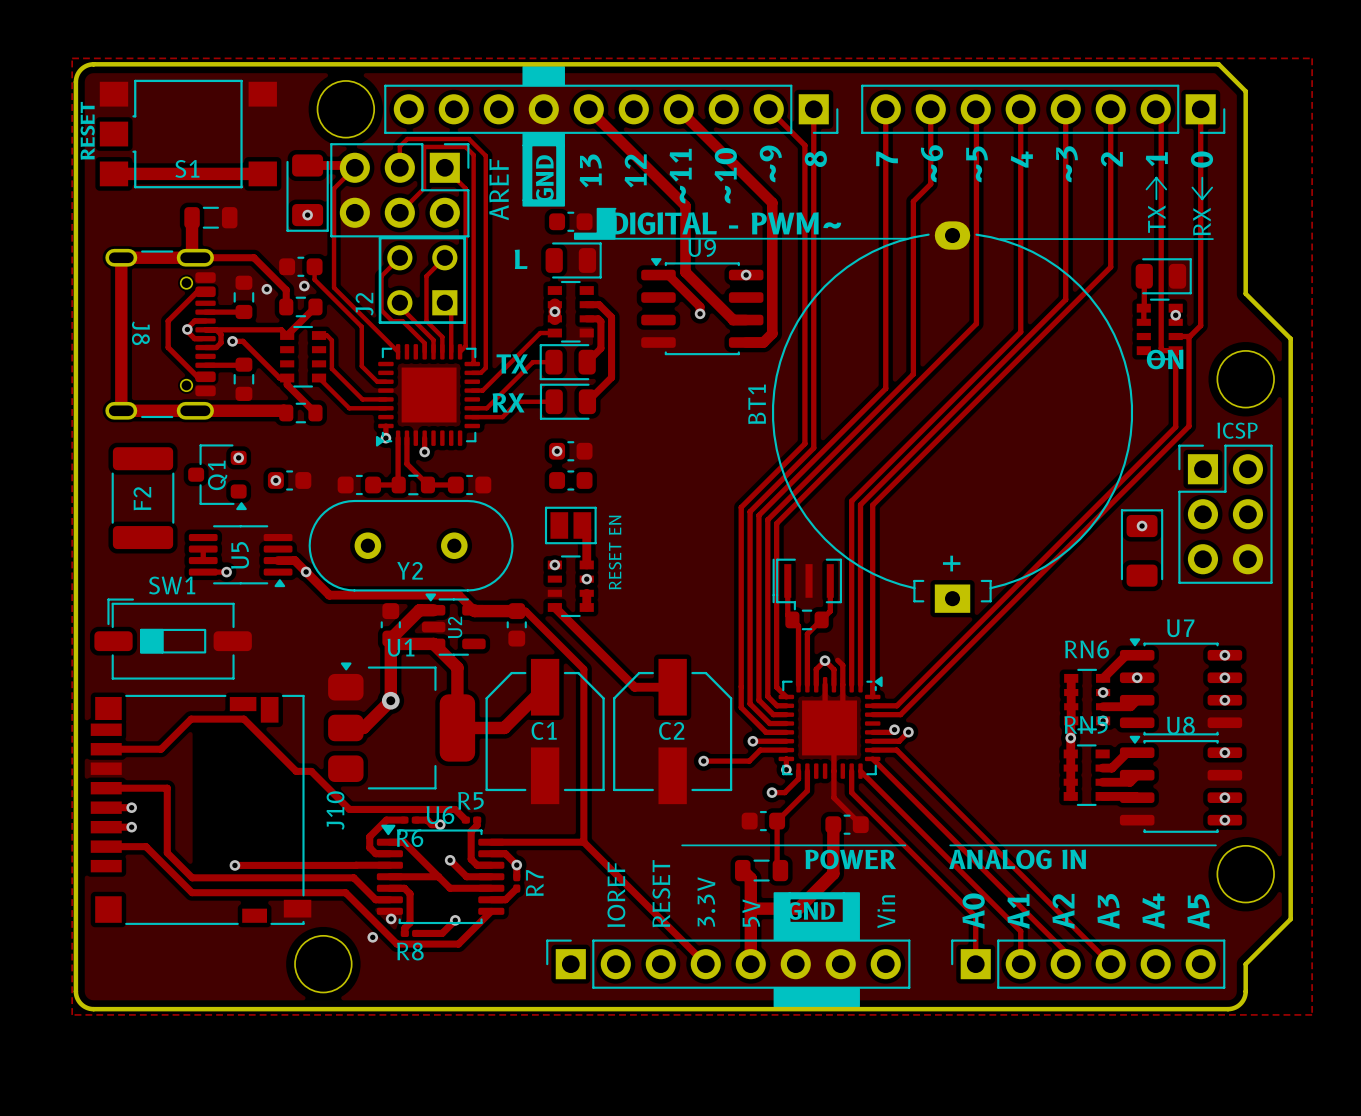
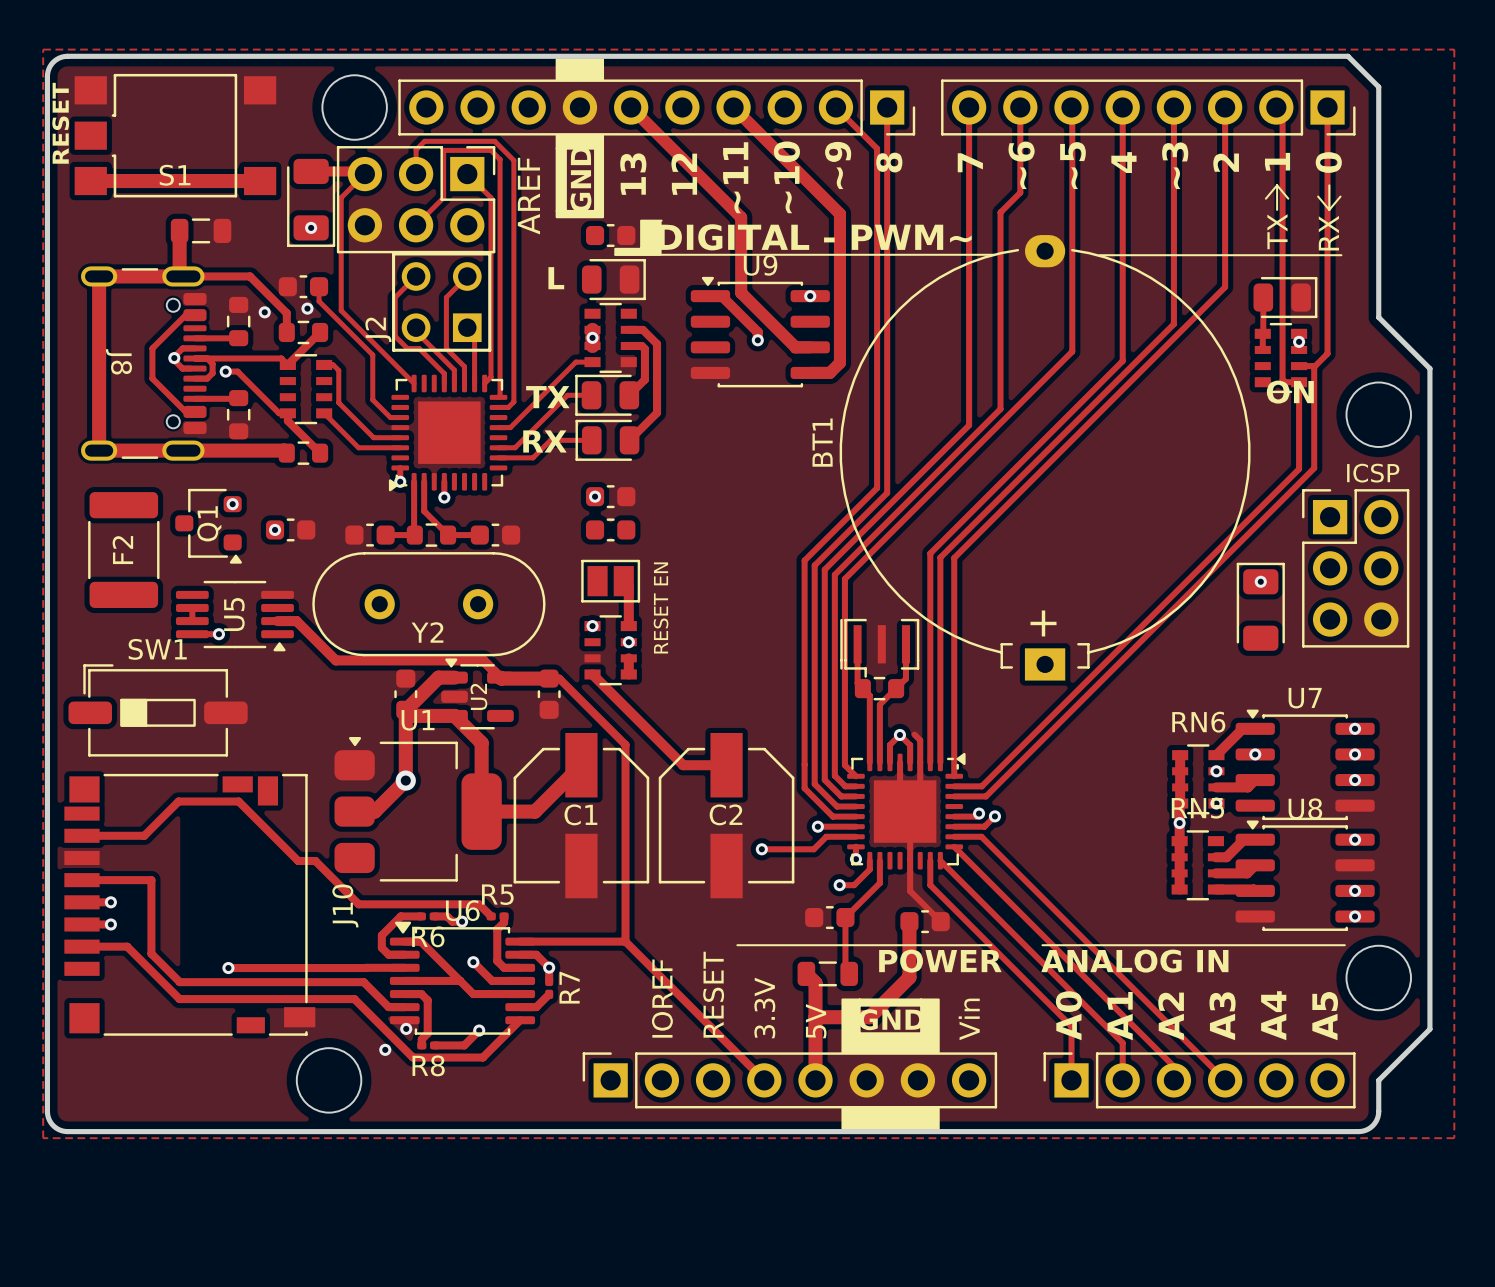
via: (306, 571) -> none

